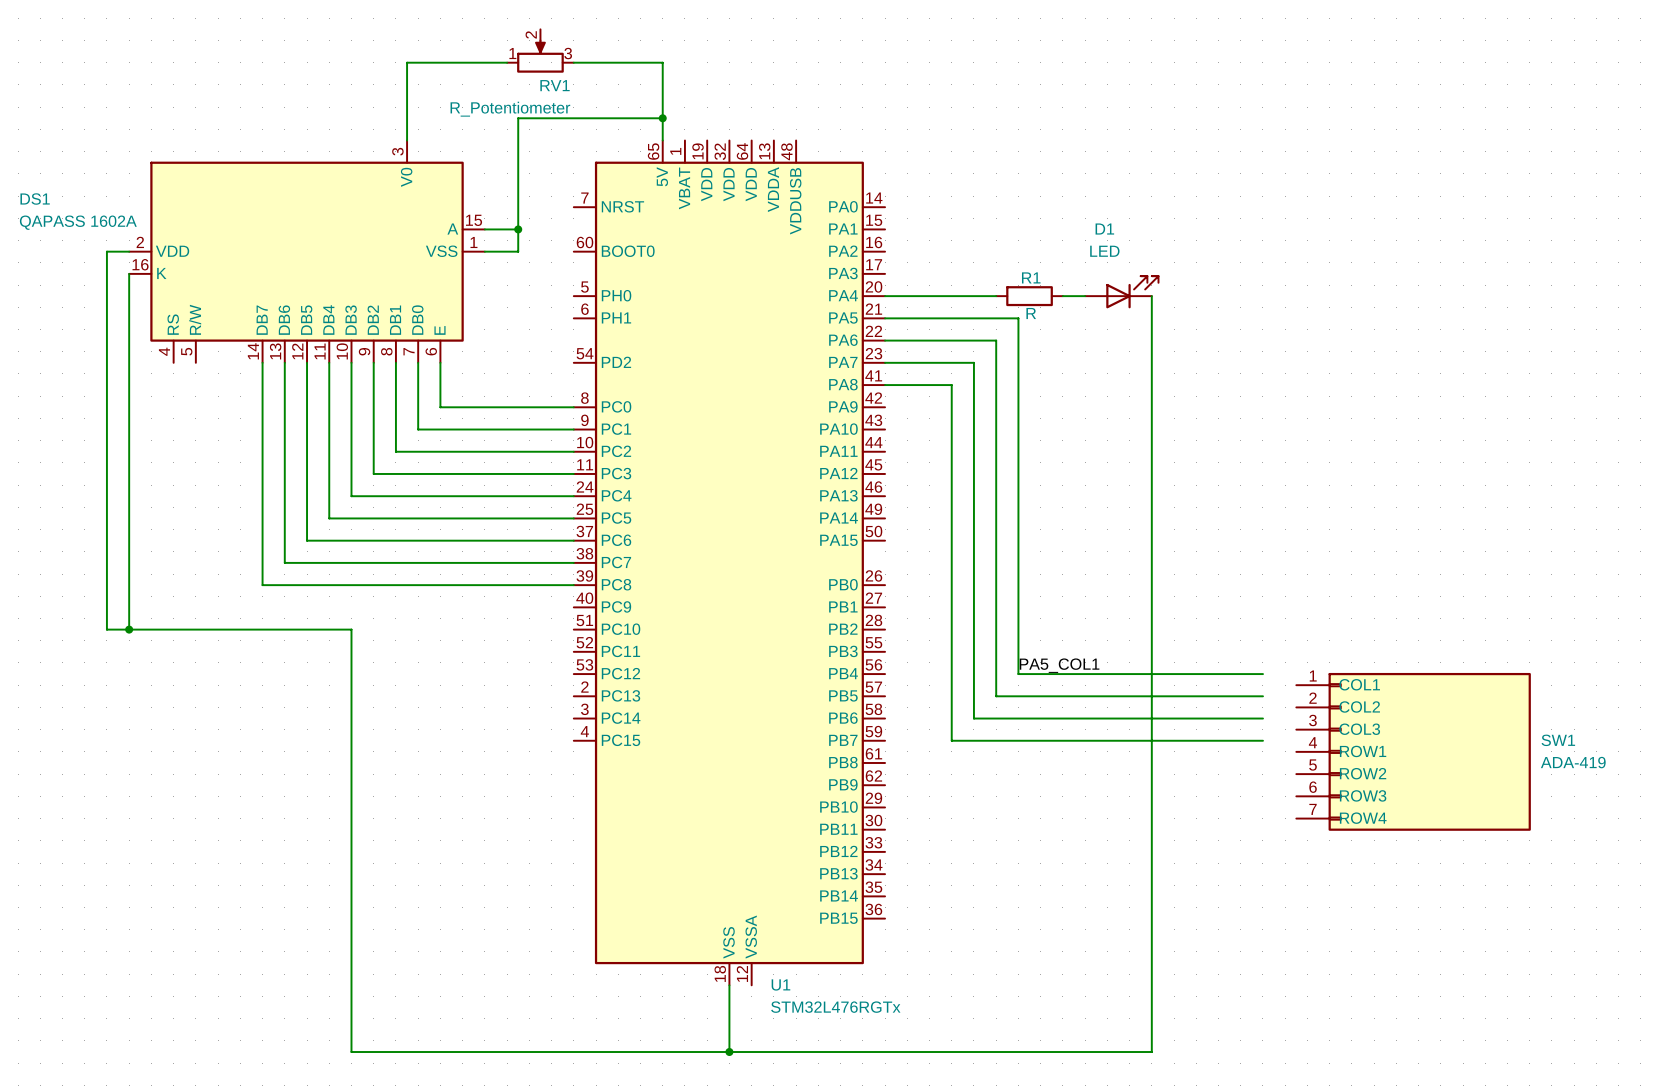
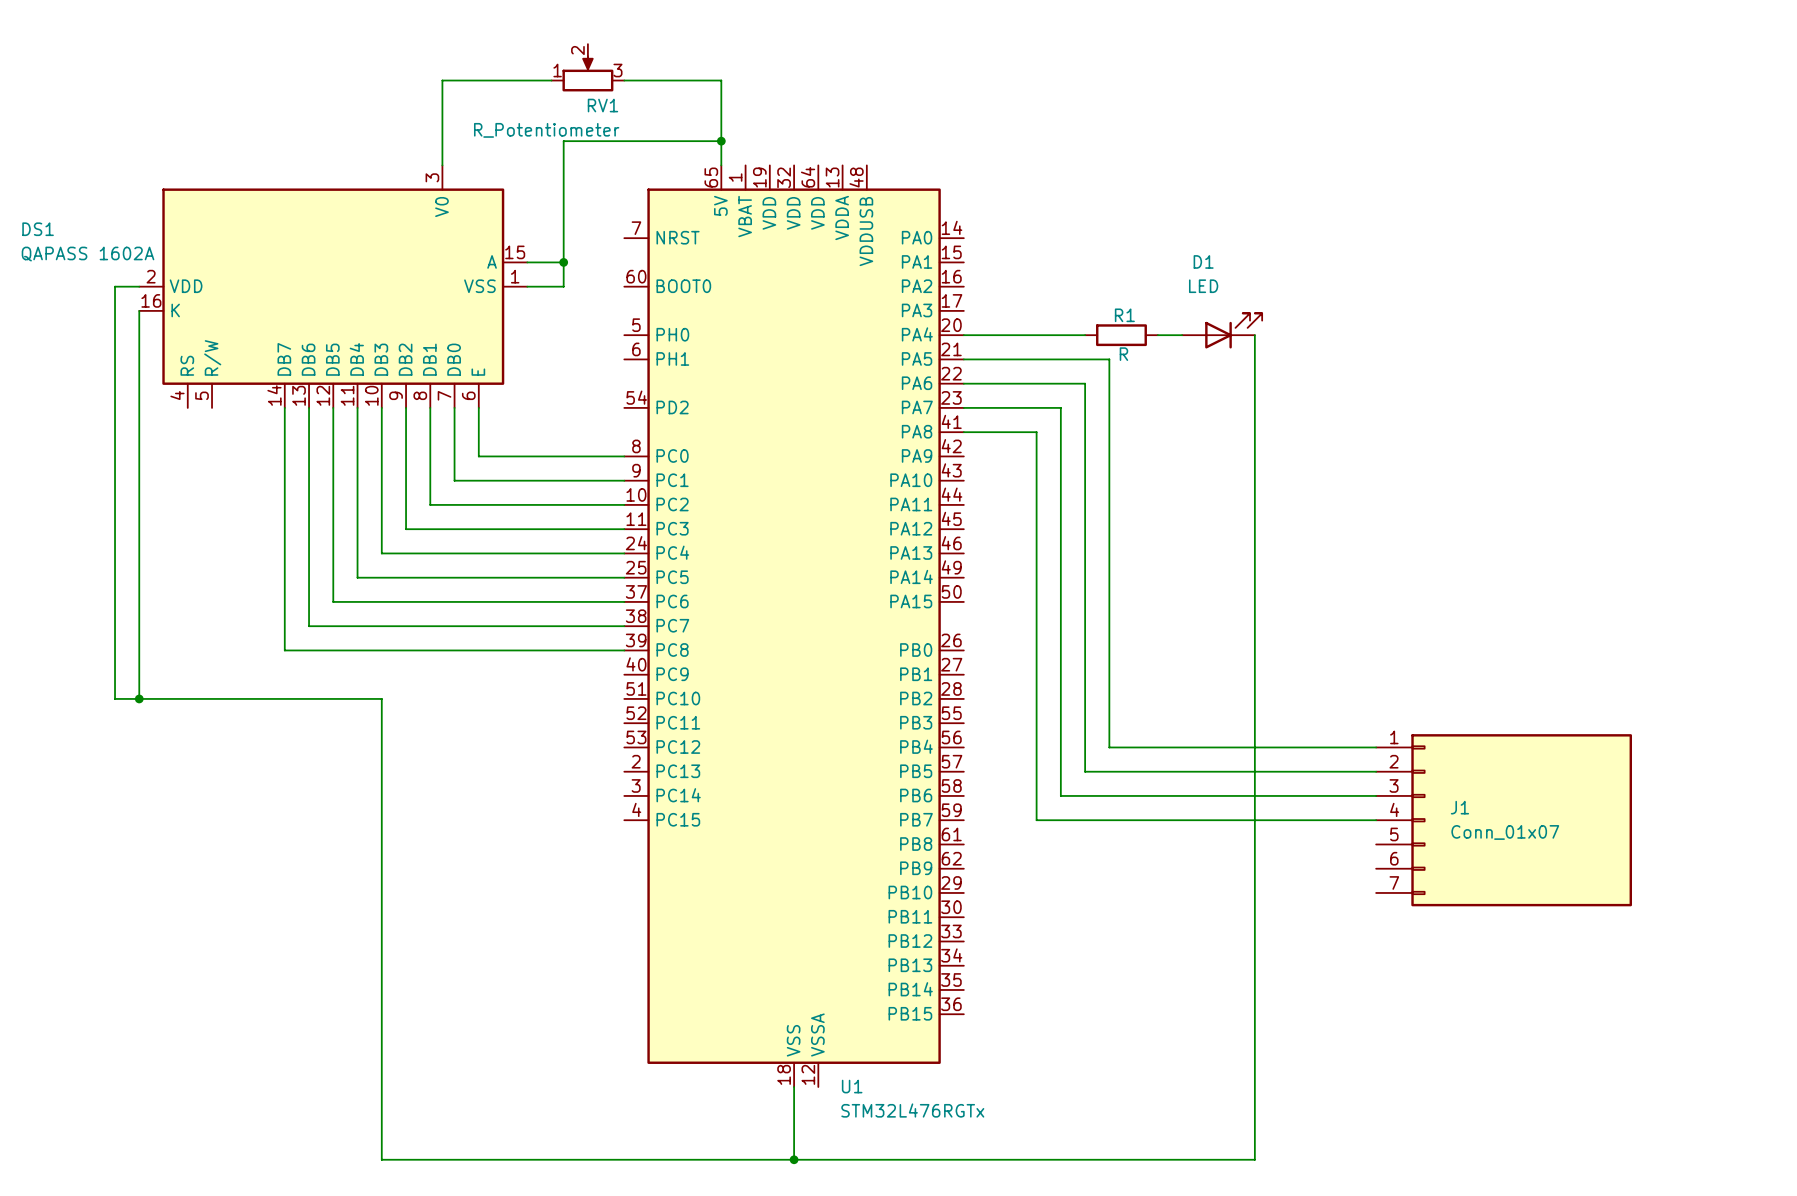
label: PA5_COL1 (1059, 665) -> none
J1: none -> Conn_01x07 (1504, 820)
SW1: ADA-419 (1413, 751) -> none

